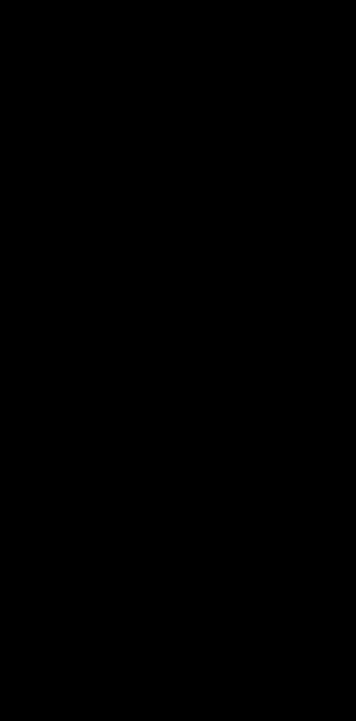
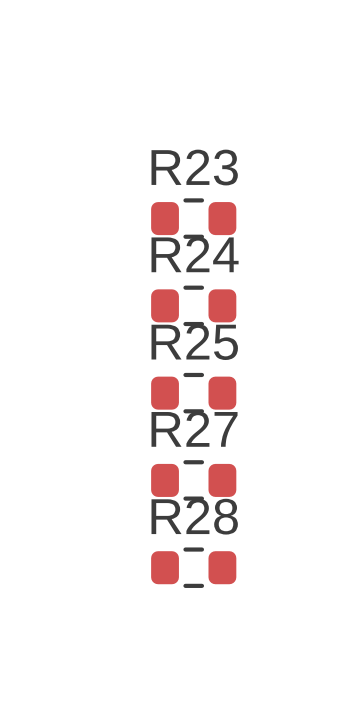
R23: none -> (193, 218)
R24: none -> (193, 305)
R25: none -> (193, 393)
R27: none -> (193, 480)
R28: none -> (193, 567)

